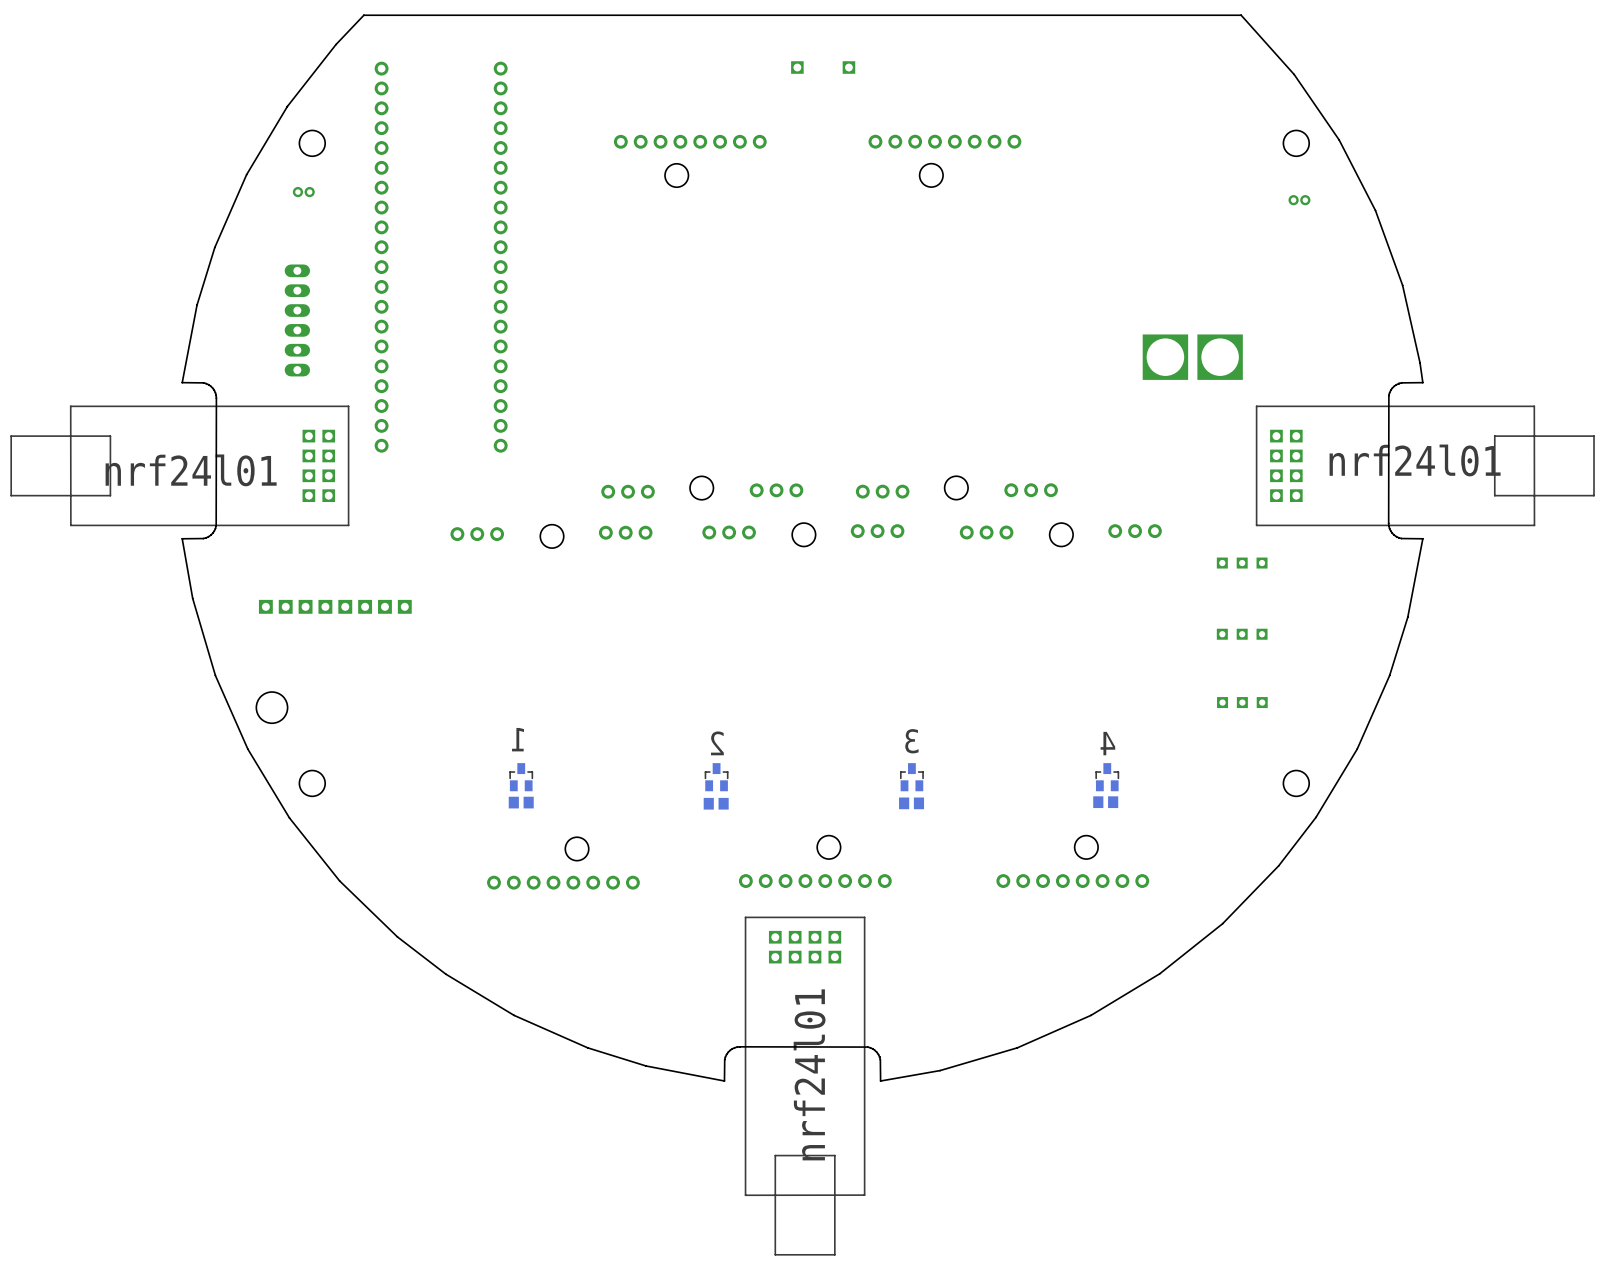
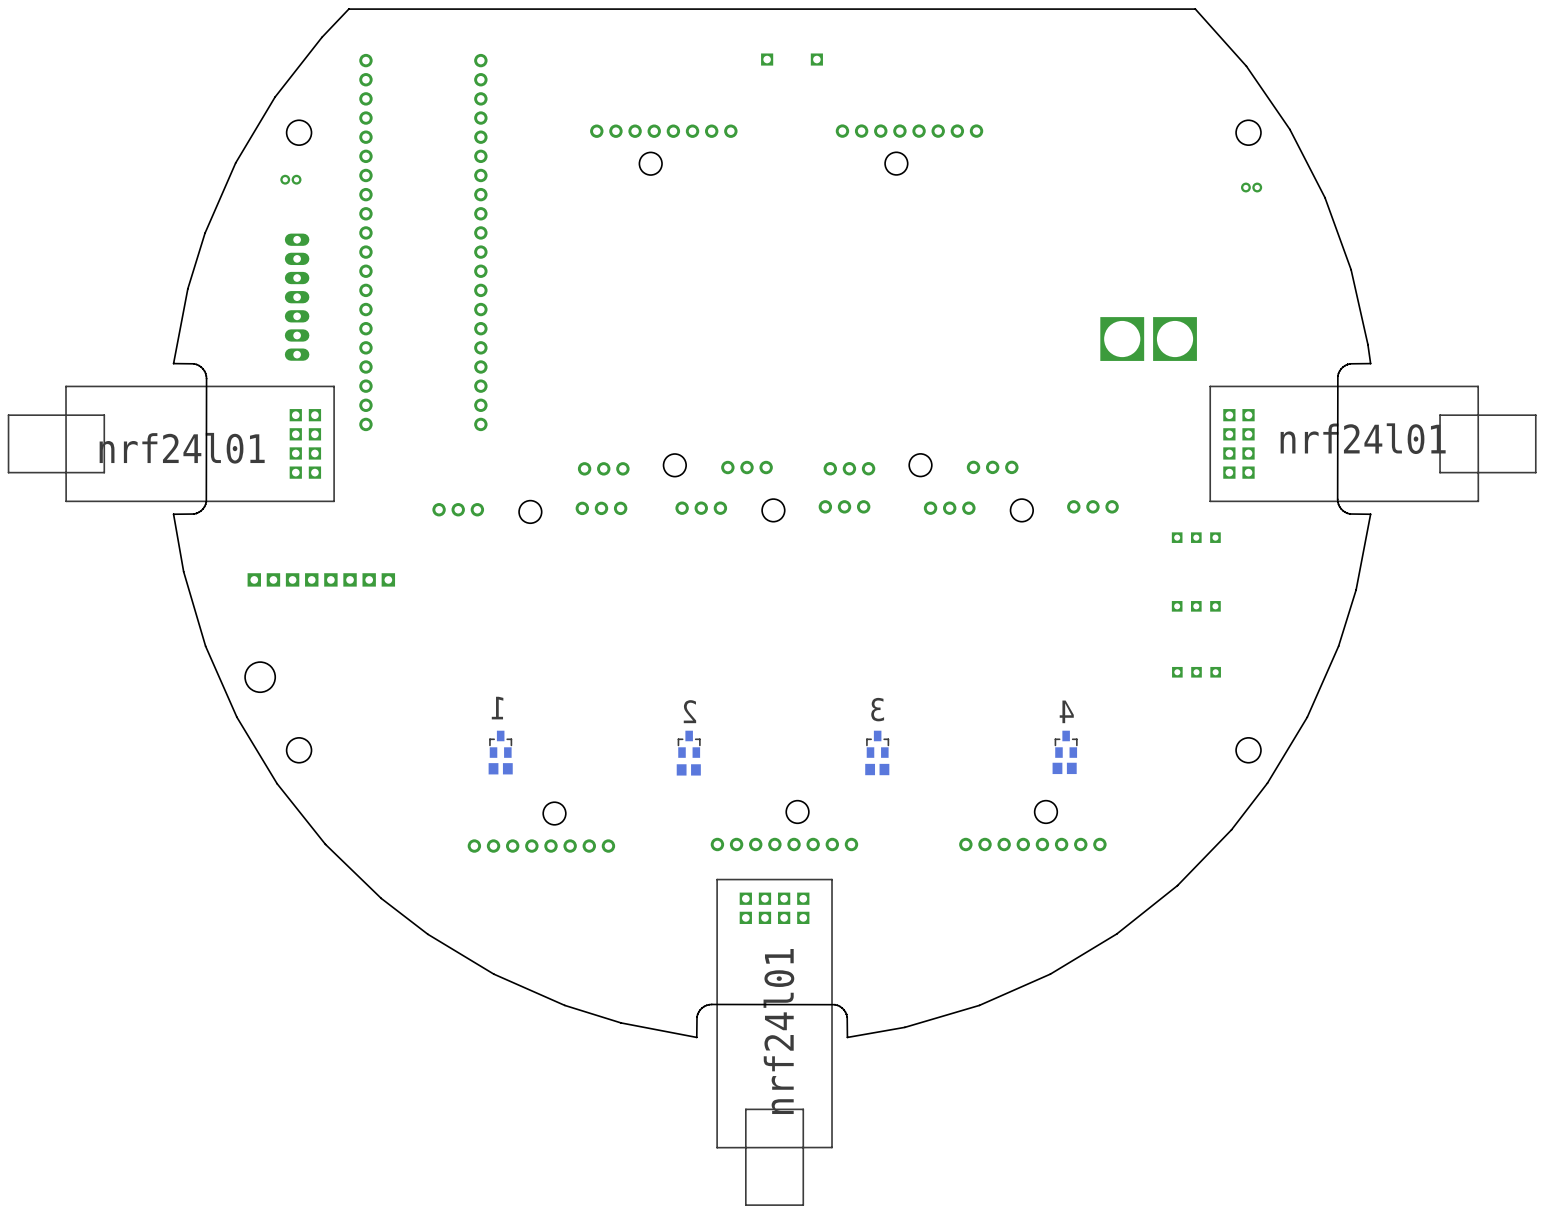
part: none -> (297, 297)
part: (297, 320) -> none

